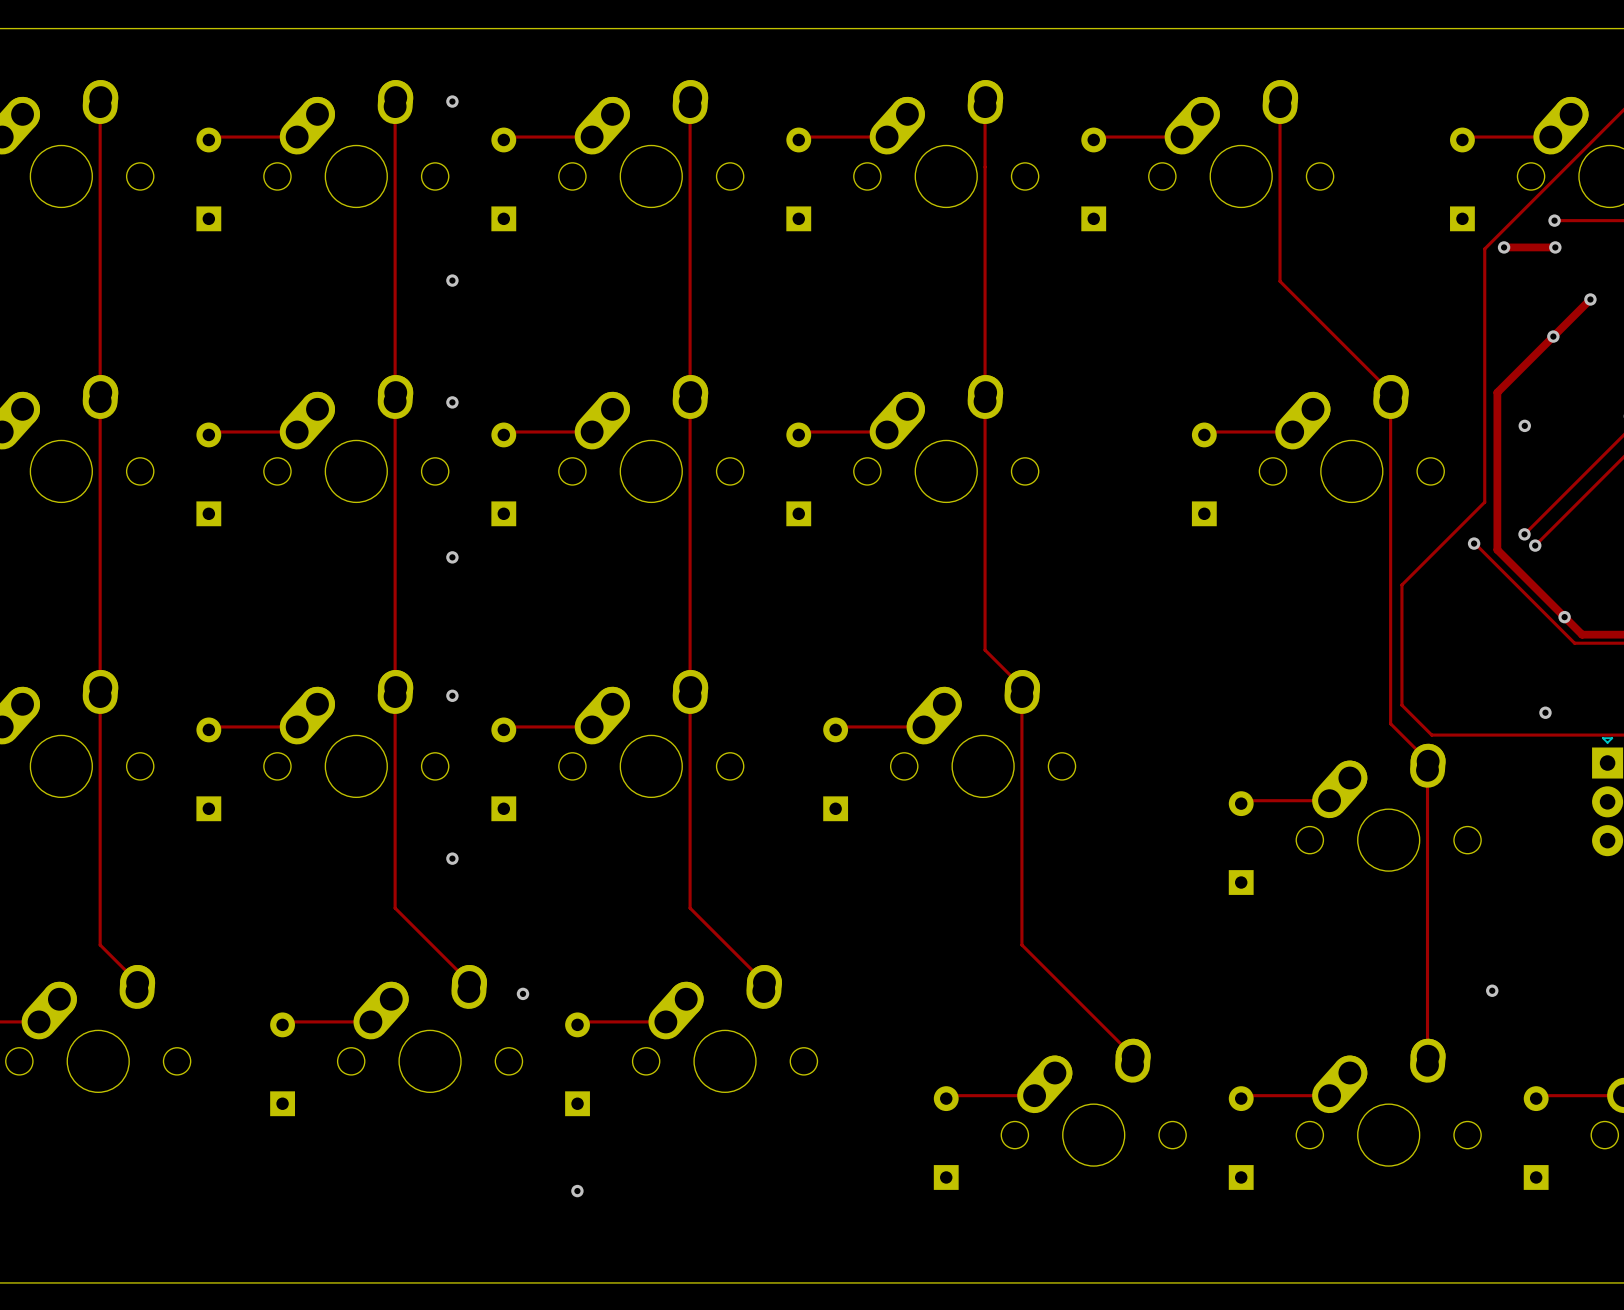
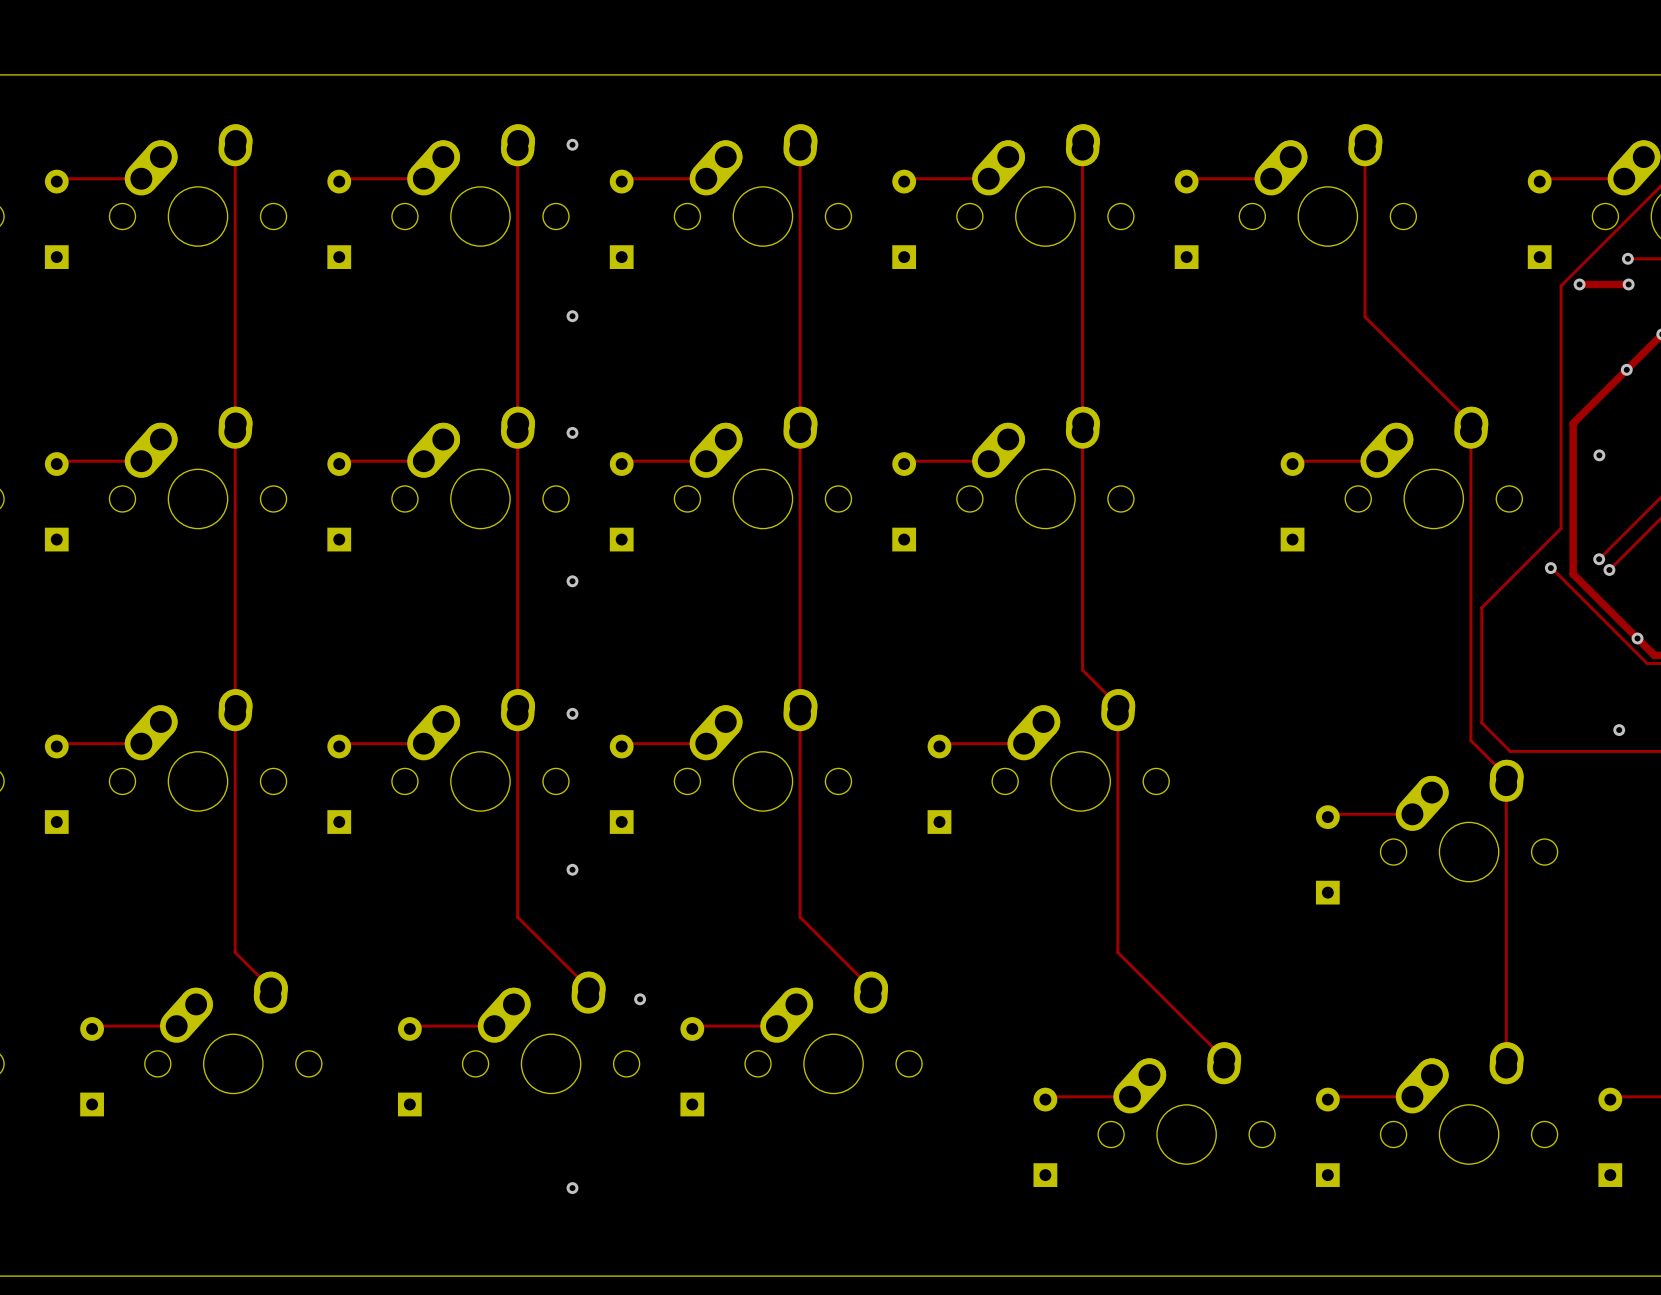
via: (1492, 990) -> none
via: none -> (572, 1188)
via: (577, 1191) -> none

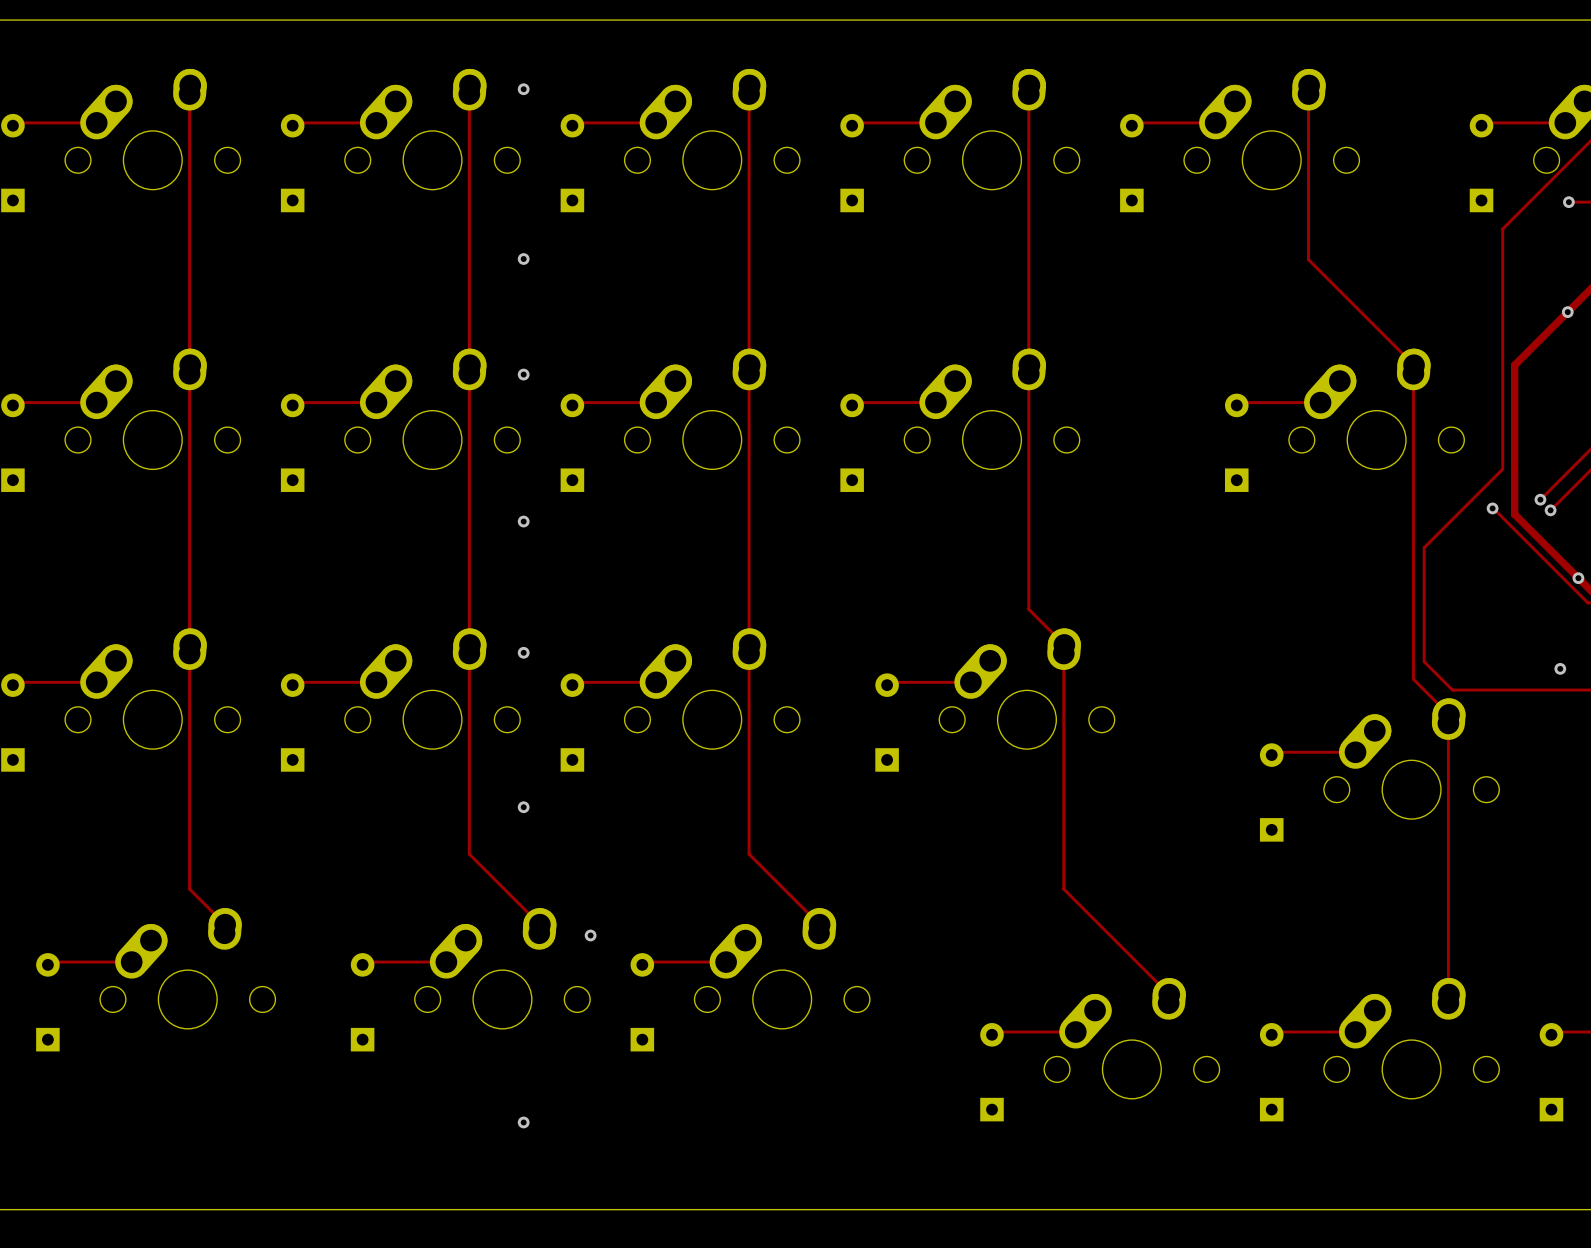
track: (1579, 284) (1628, 284) -> none
via: (1579, 284) -> none
via: (1628, 284) -> none
via: (1599, 455) -> none

